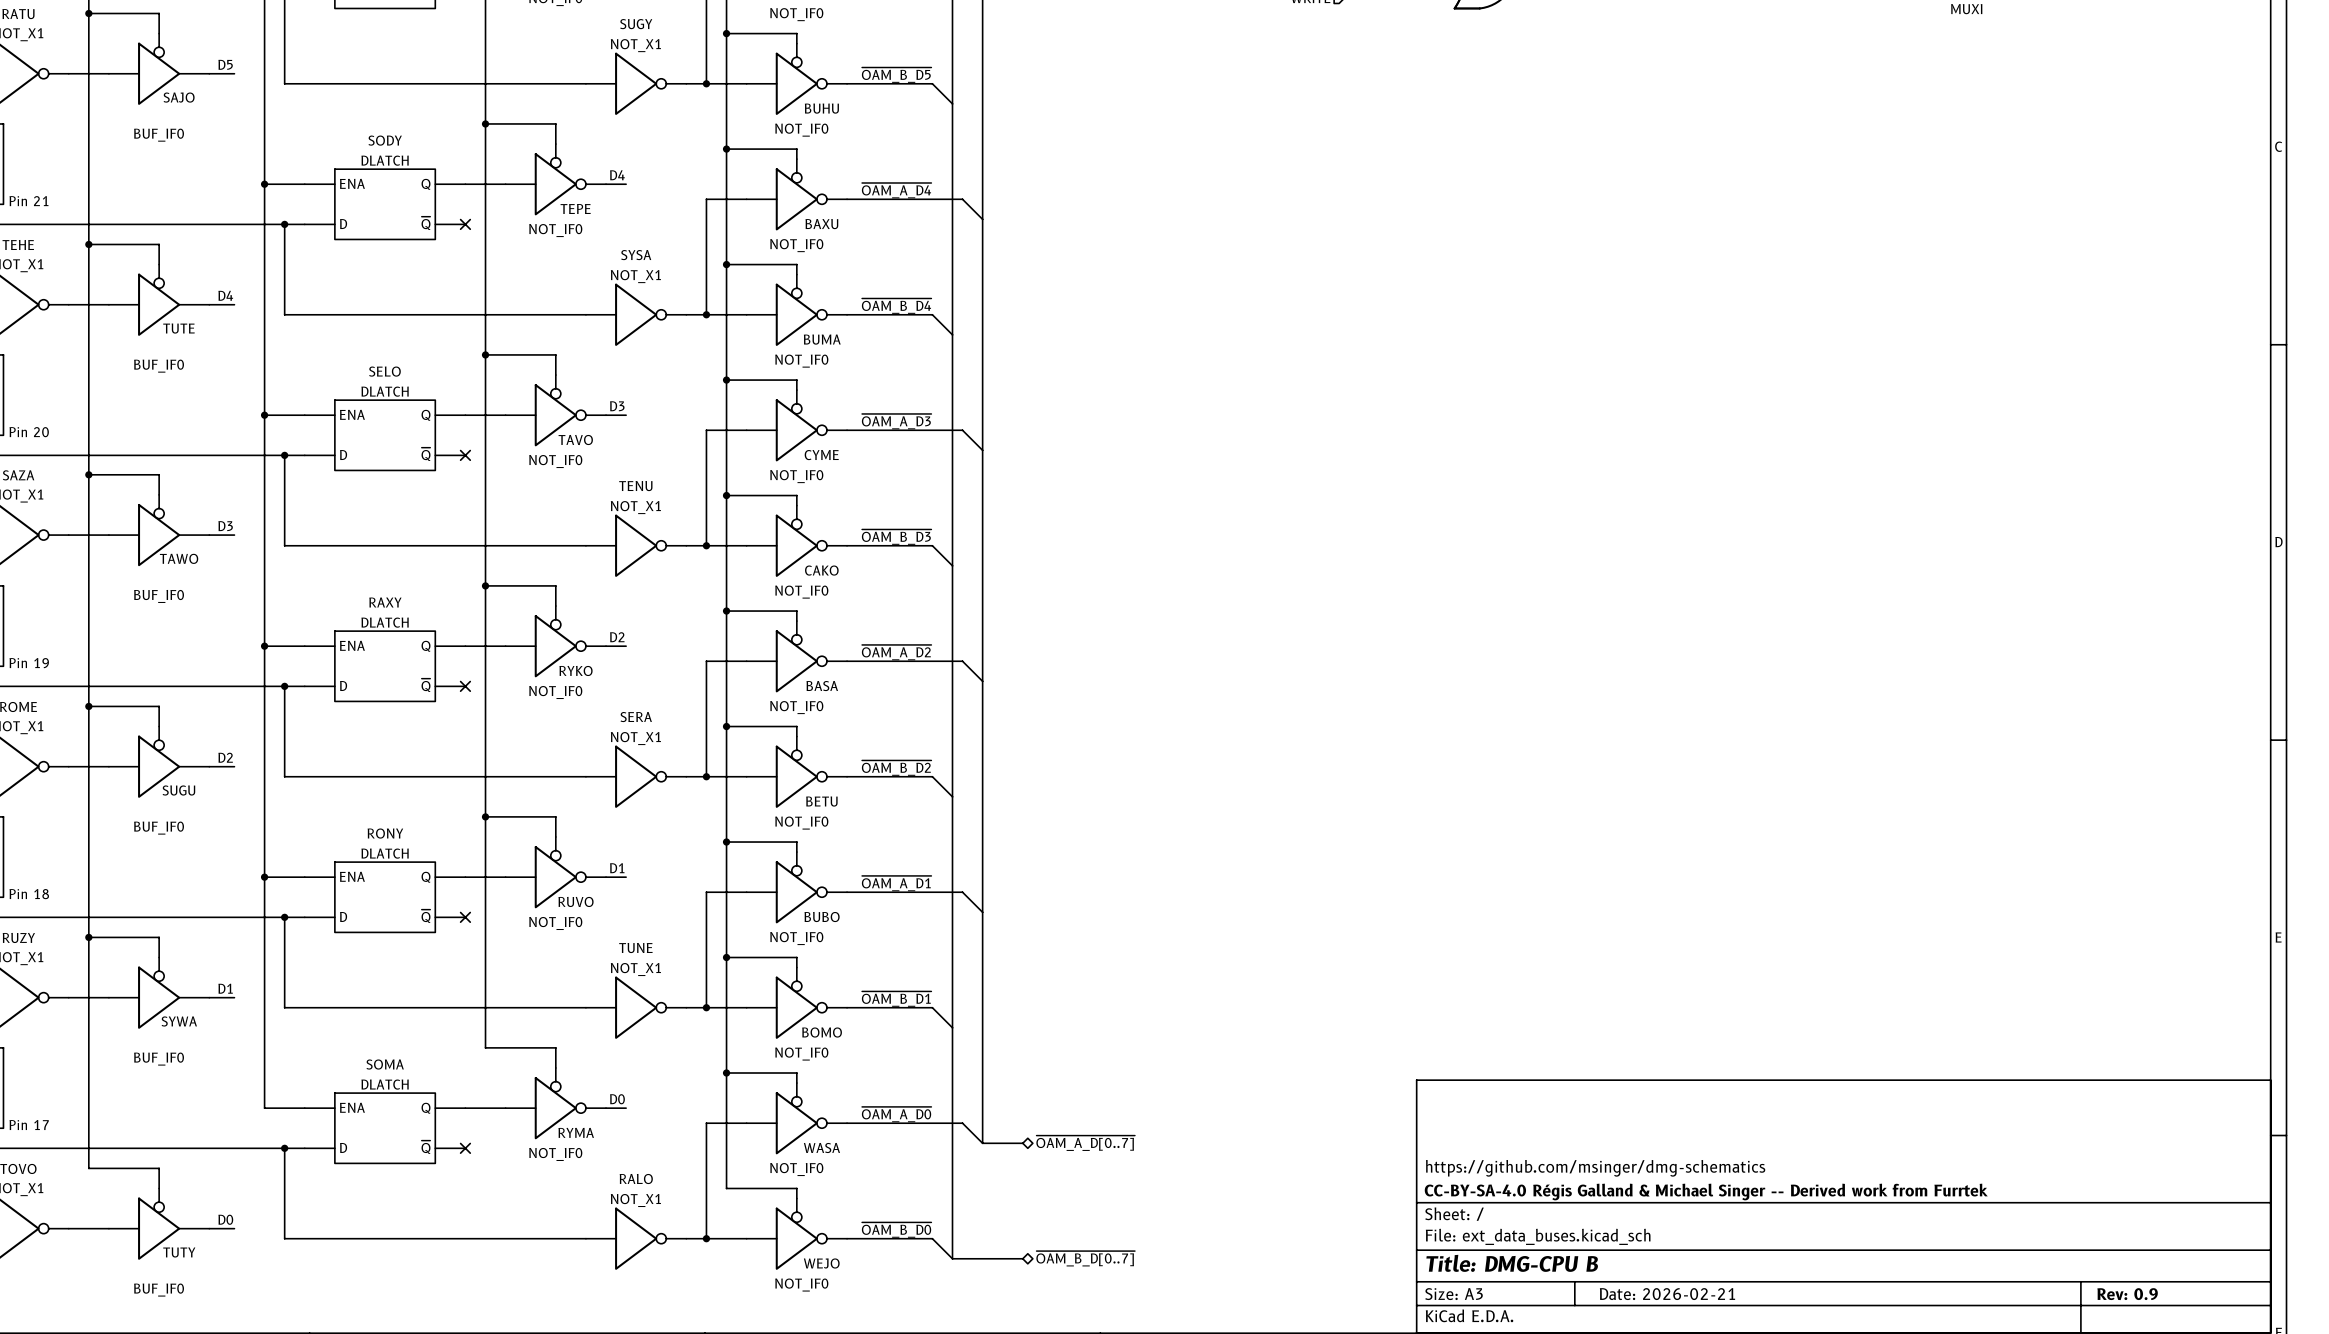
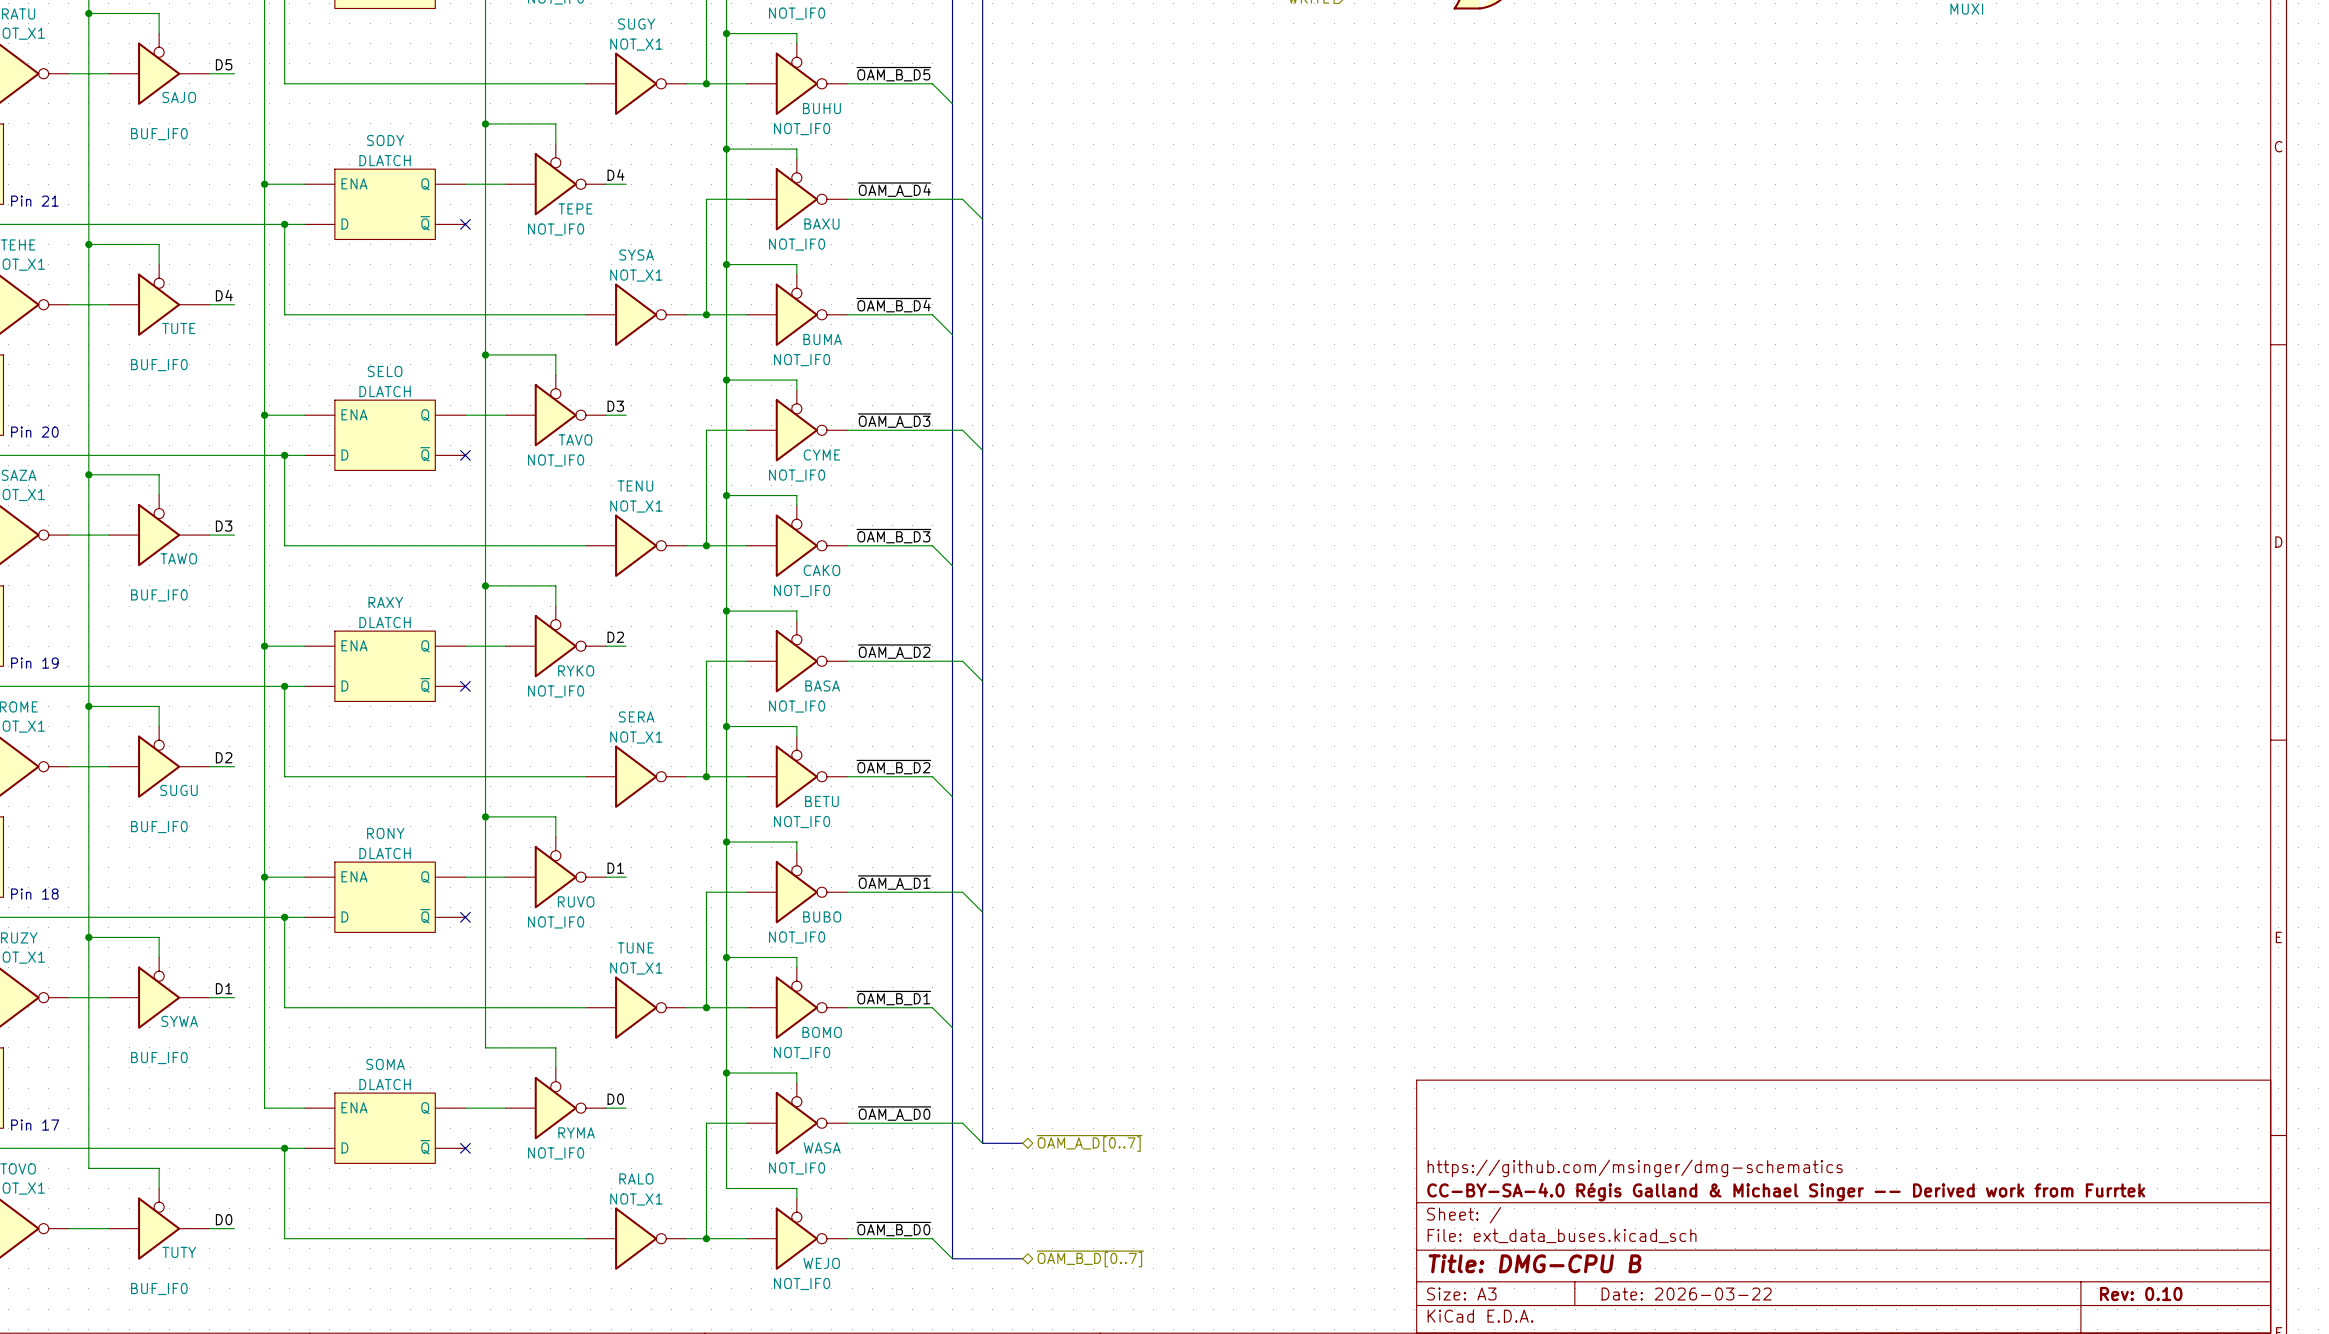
title block: Date: 2026-02-21 (1667, 1294) -> Date: 2026-03-22 (1686, 1294)
title block: Rev: 0.9 (2127, 1294) -> Rev: 0.10 (2141, 1294)

